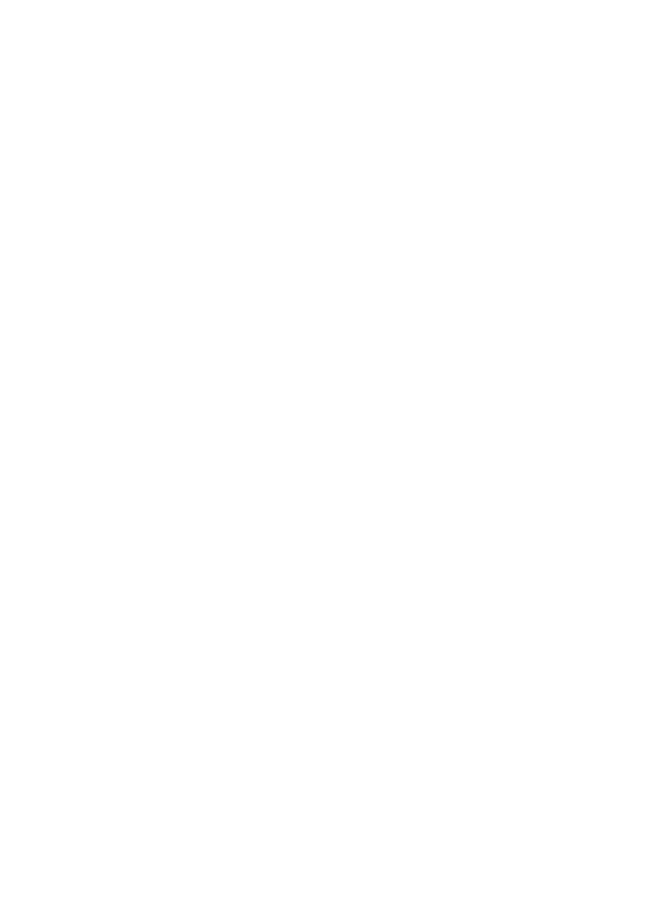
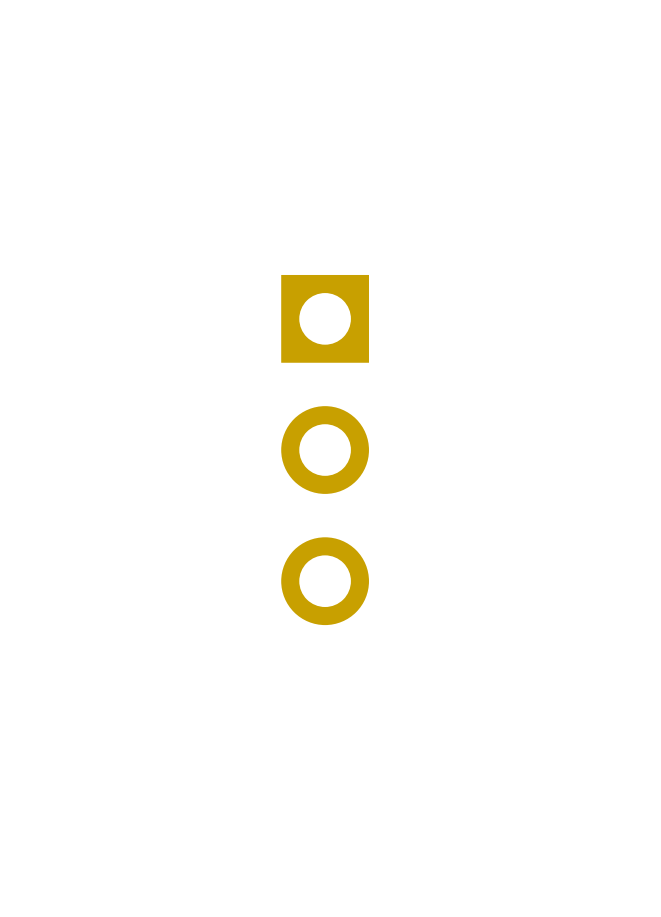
part: none -> (325, 450)

